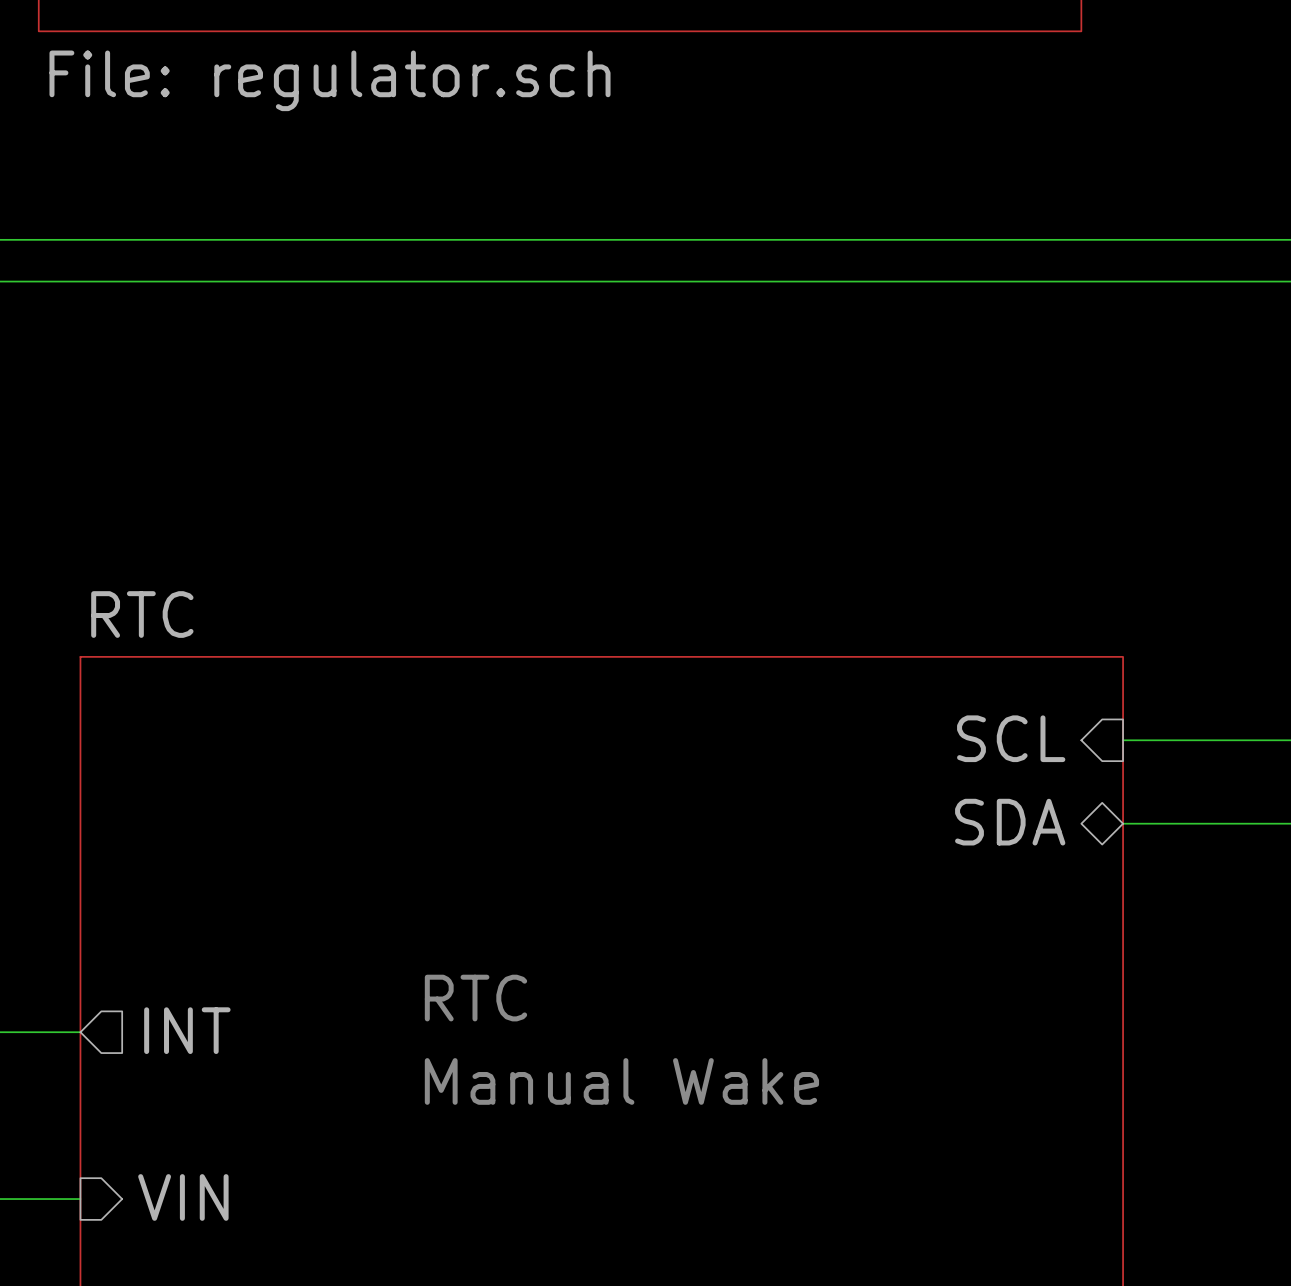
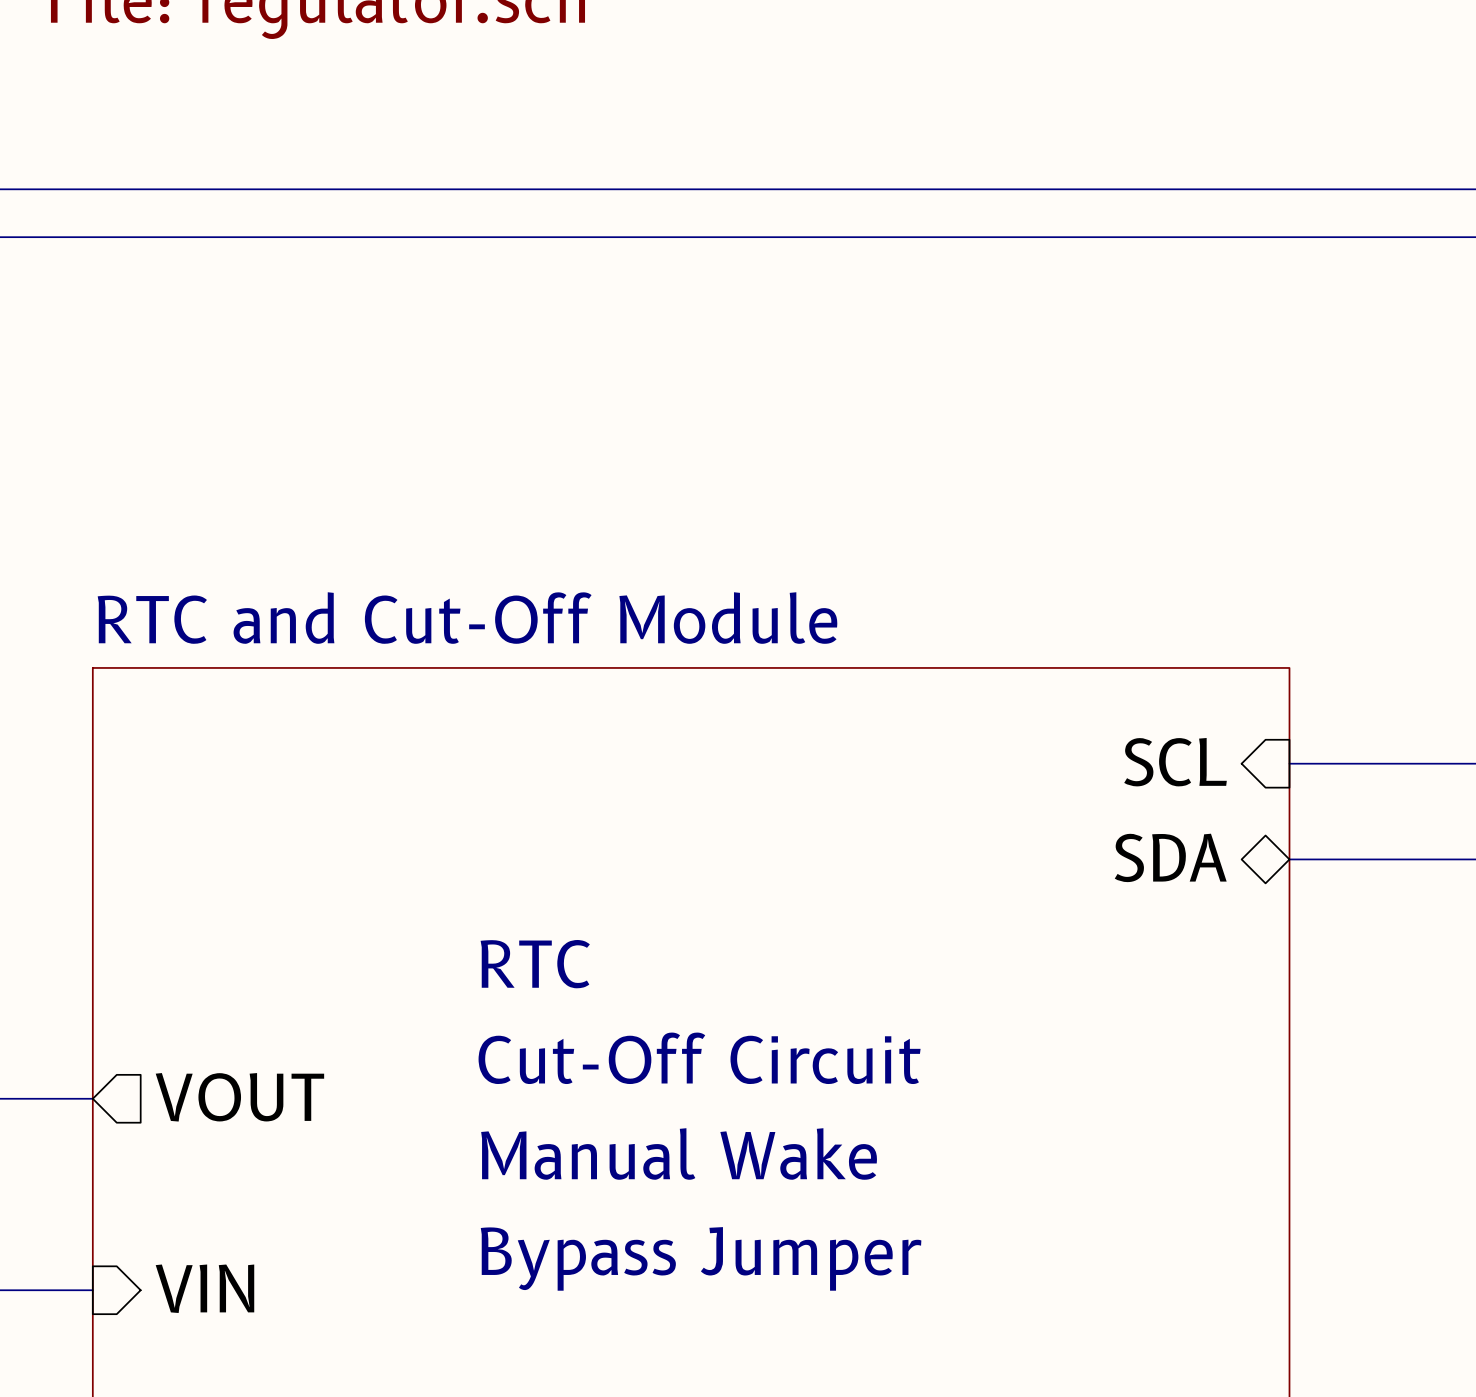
sheet RTC name: RTC (142, 614) -> RTC and Cut-Off Module (467, 618)
text: none -> RTC (535, 964)
text: RTC (475, 998) -> Cut-Off Circuit (699, 1058)
sheet pin: INT (187, 1030) -> VOUT (239, 1097)
text: none -> Bypass Jumper (701, 1258)

